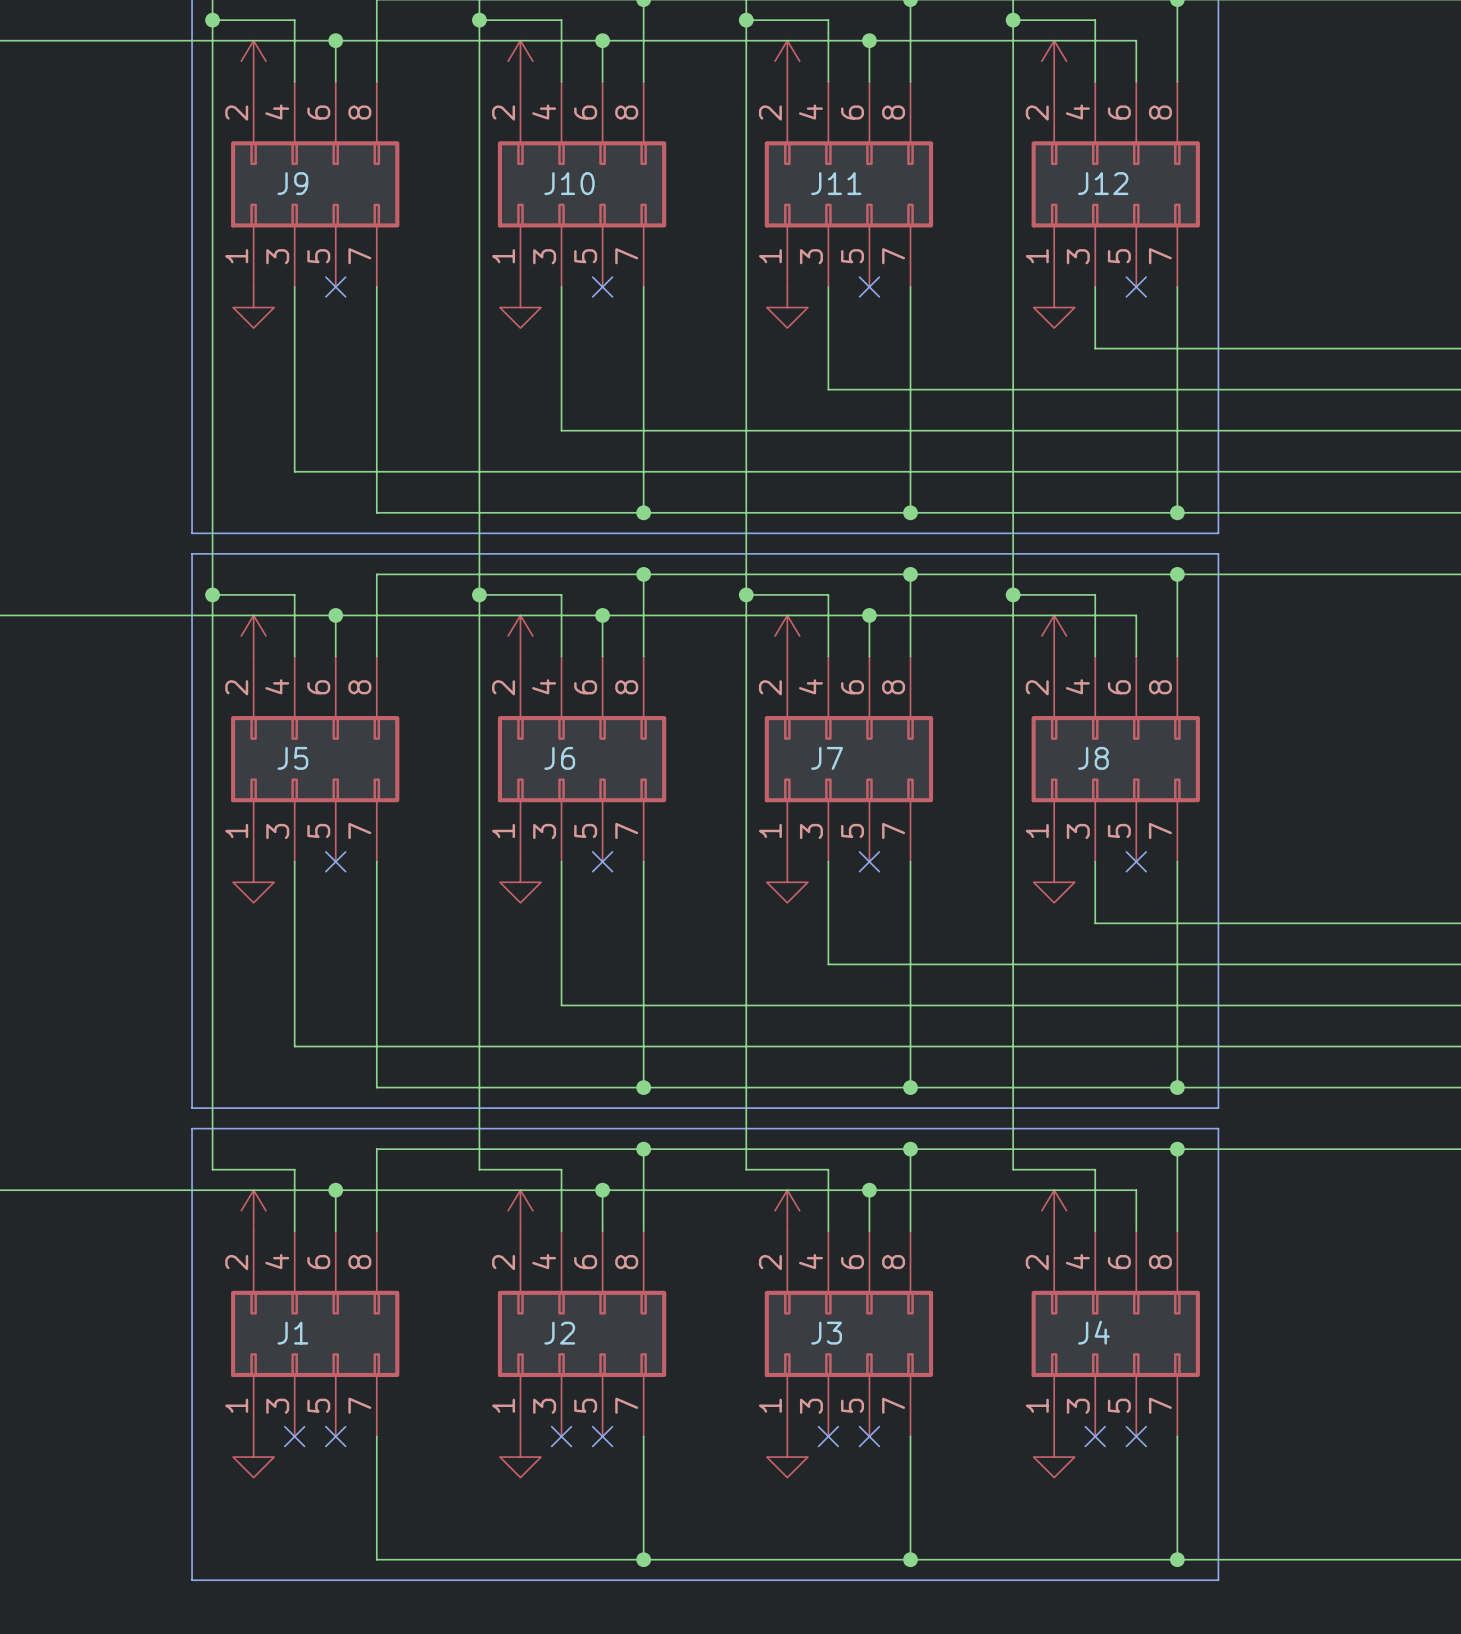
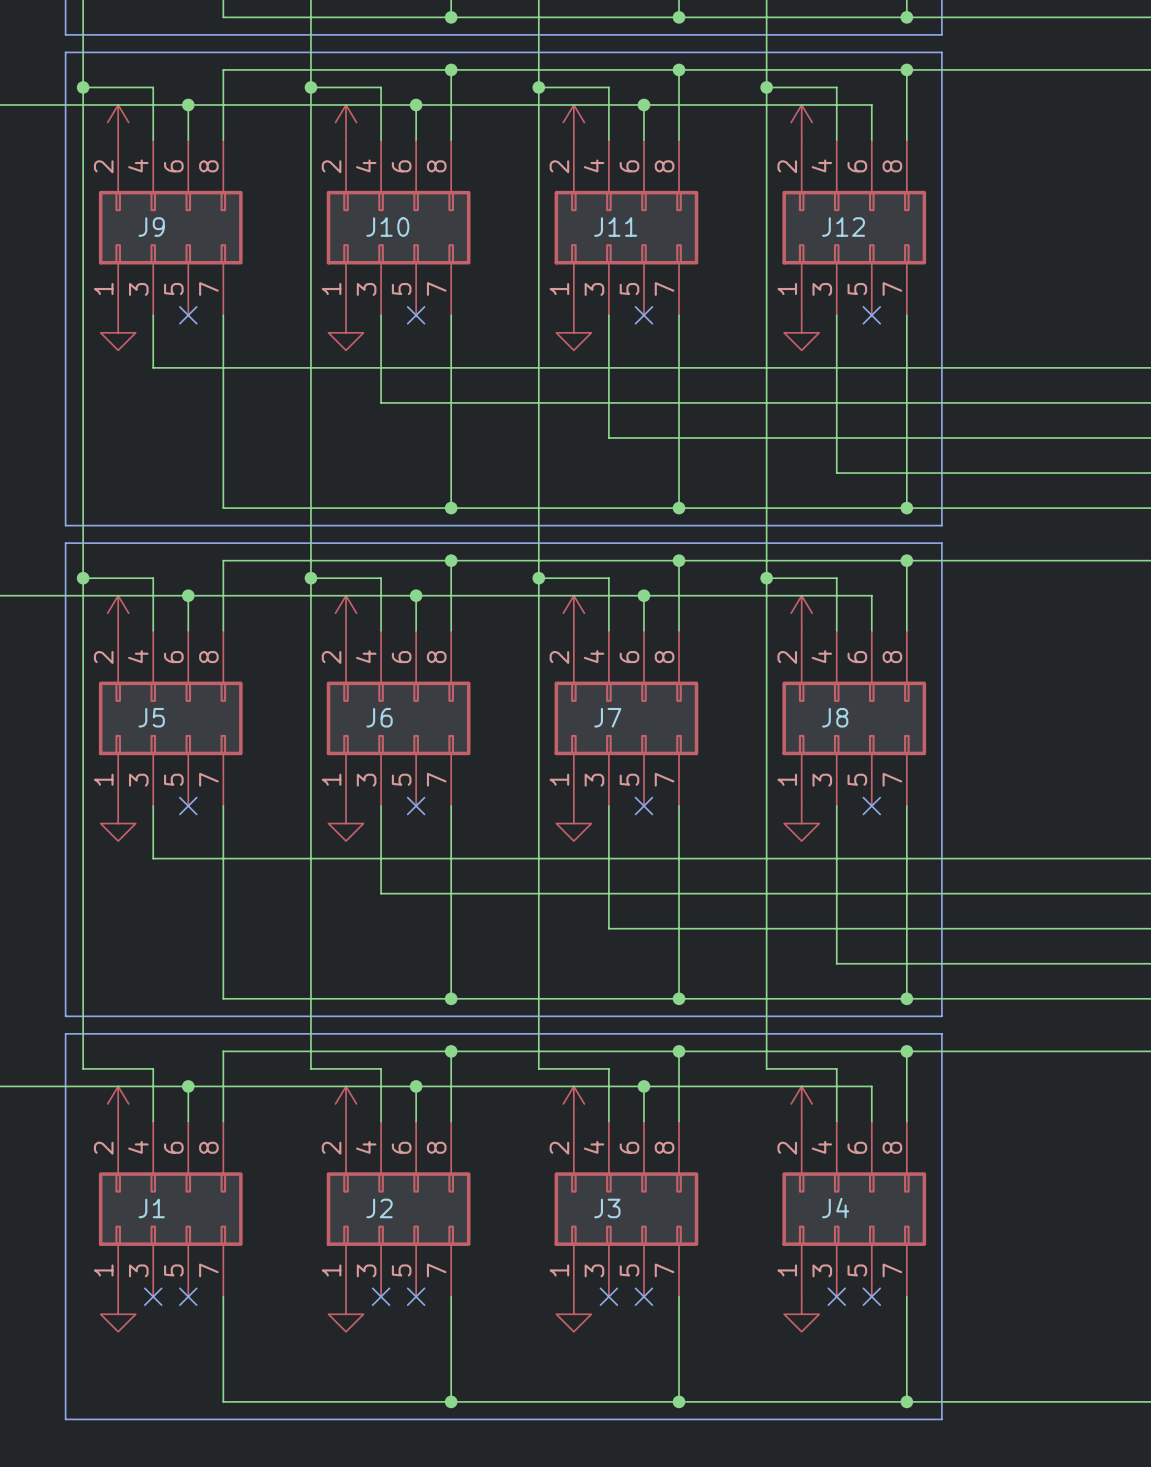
wire: (294, 348) (294, 471) (1095, 471) -> (153, 367) (836, 367) (836, 473)
wire: (561, 389) (561, 430) (828, 430) -> (381, 402) (608, 402) (608, 437)
wire: (294, 923) (294, 1046) (1095, 1046) -> (153, 858) (836, 858) (836, 963)
wire: (561, 964) (561, 1005) (828, 1005) -> (381, 893) (608, 893) (608, 928)

